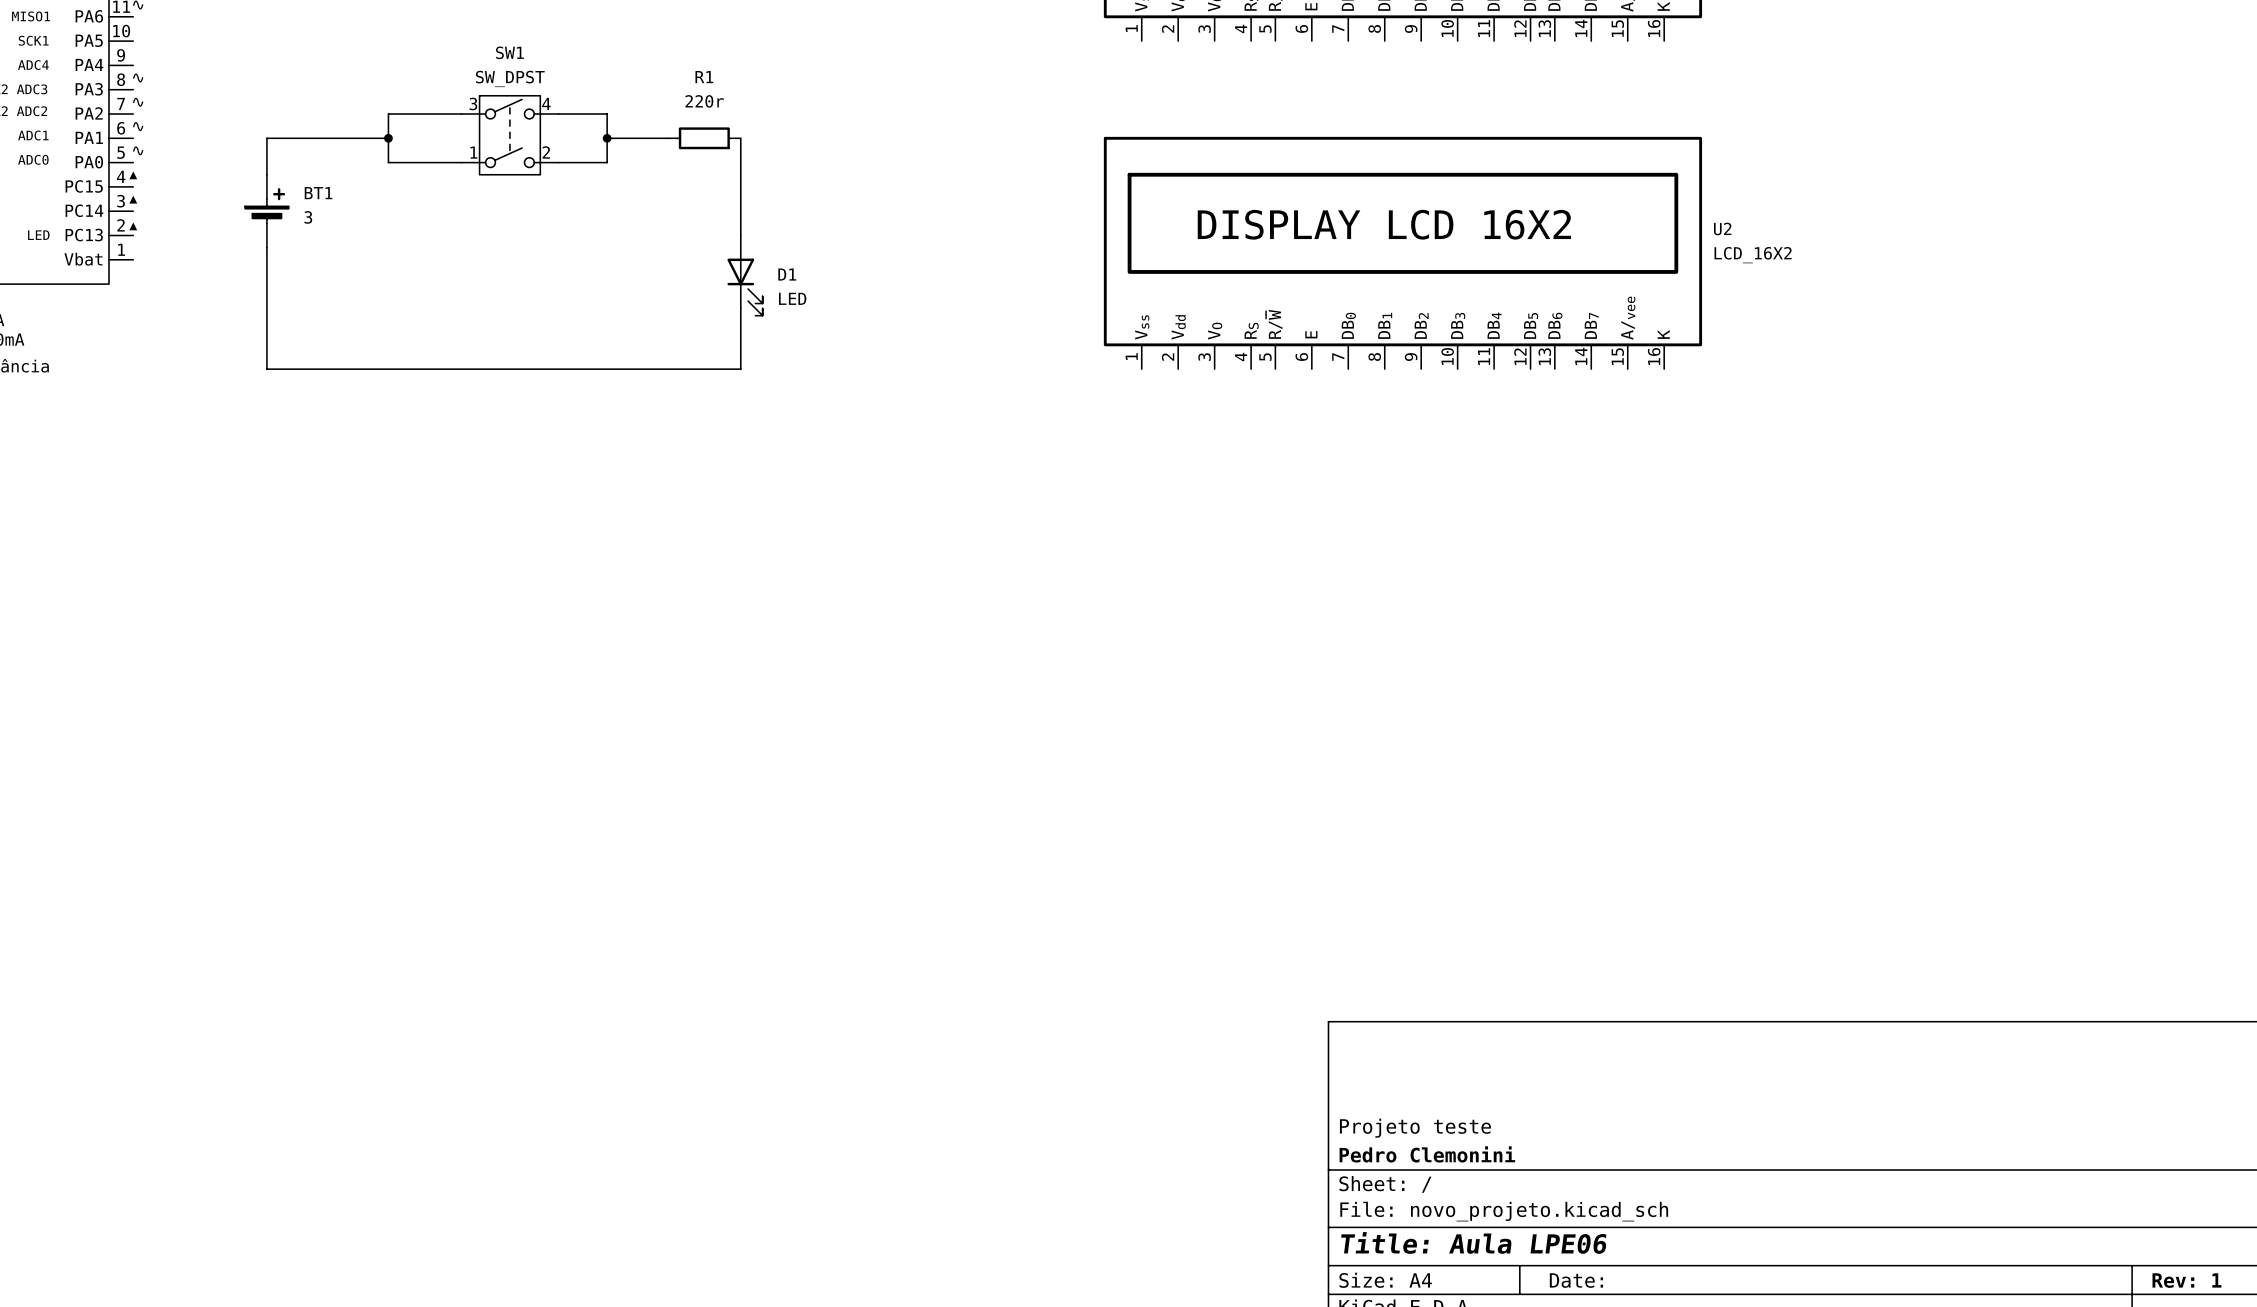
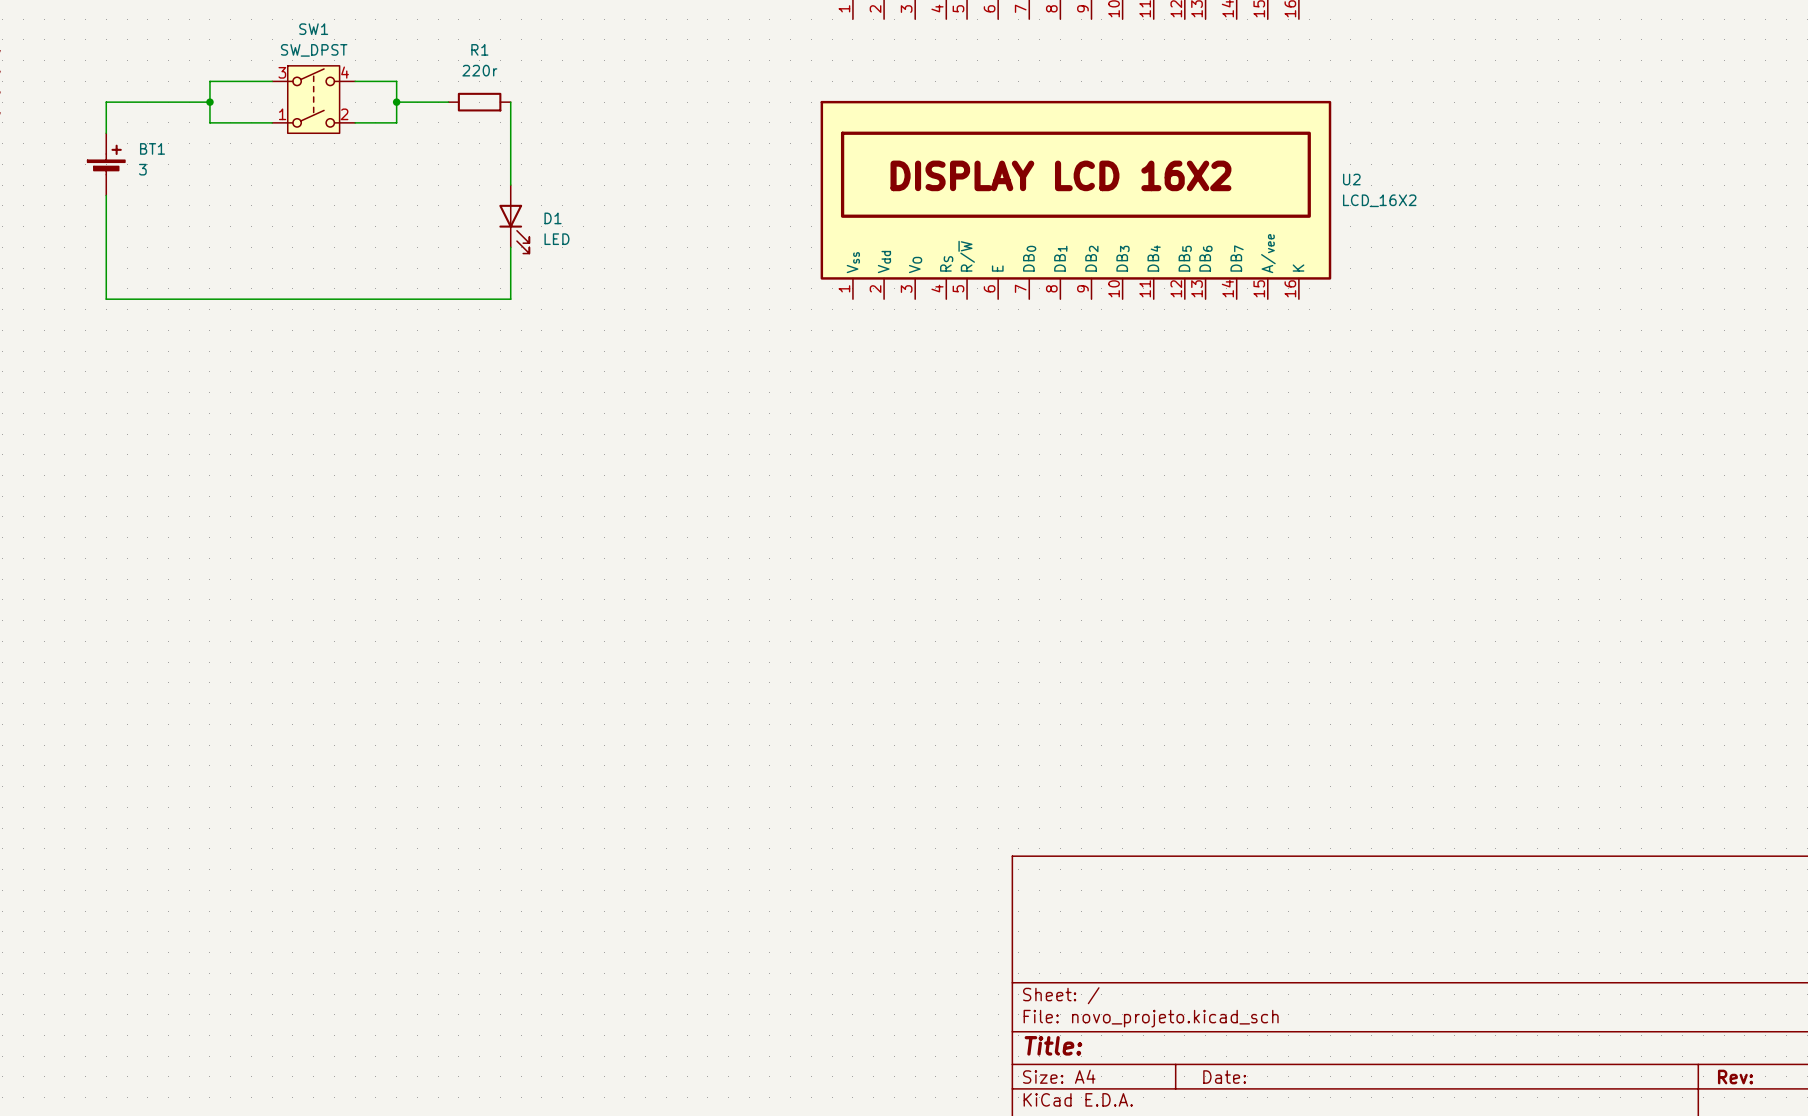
title block: Projeto teste (1415, 1128) -> none
title block: Pedro Clemonini (1427, 1154) -> none
title block: Title: Aula LPE06 (1473, 1242) -> Title: (1053, 1045)
title block: Rev: 1 (2186, 1280) -> Rev: (1735, 1077)

